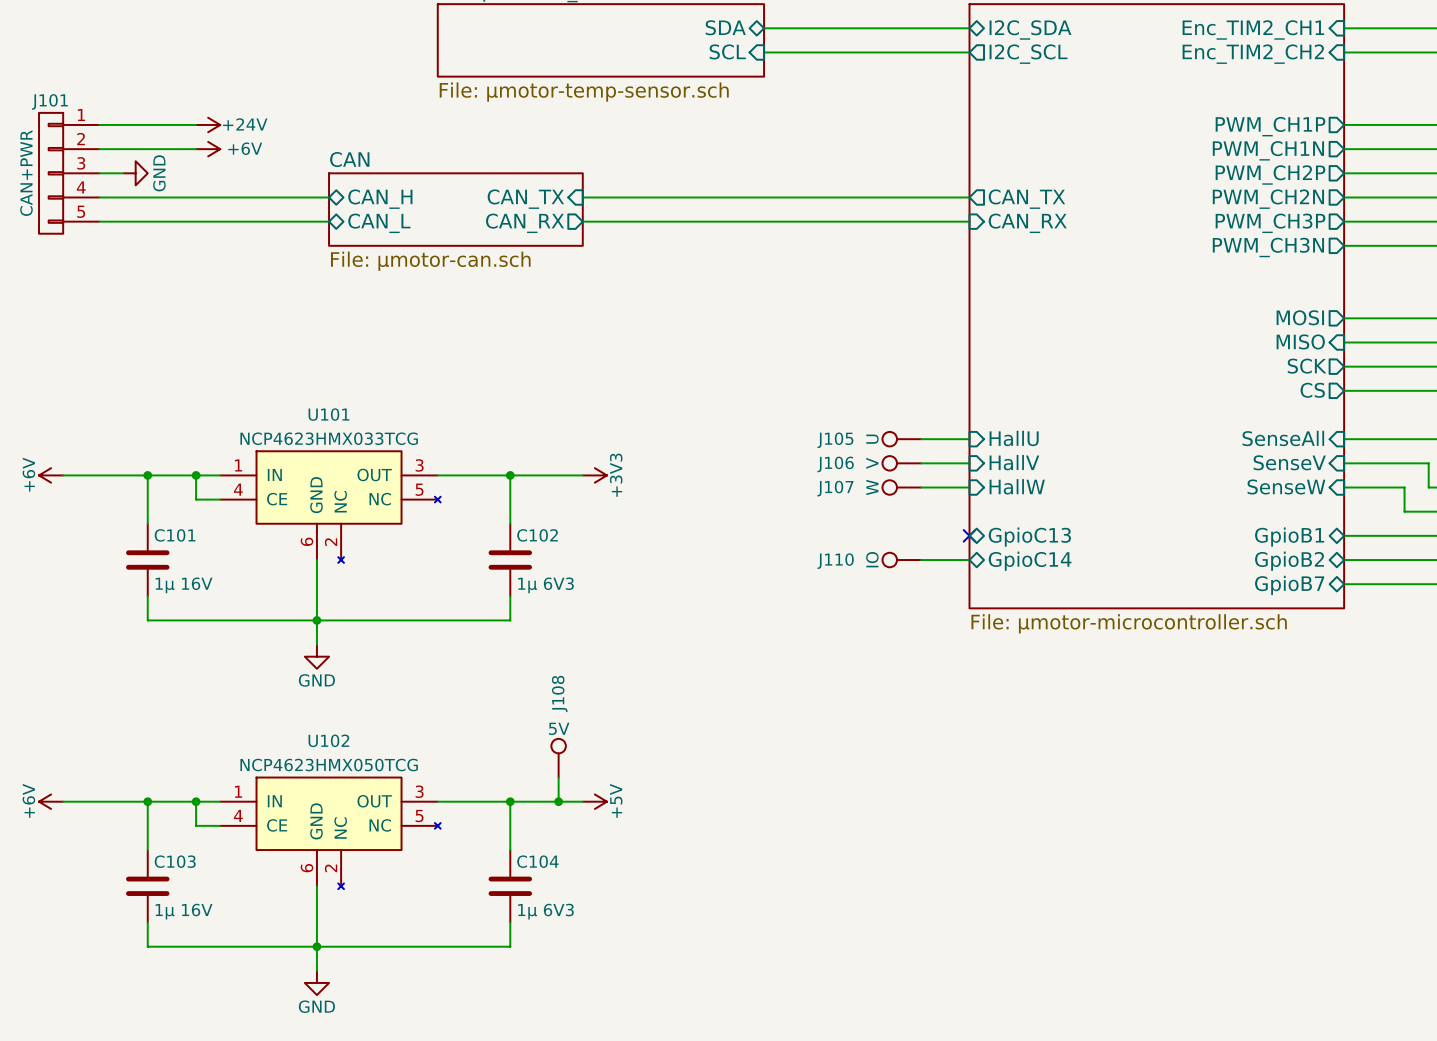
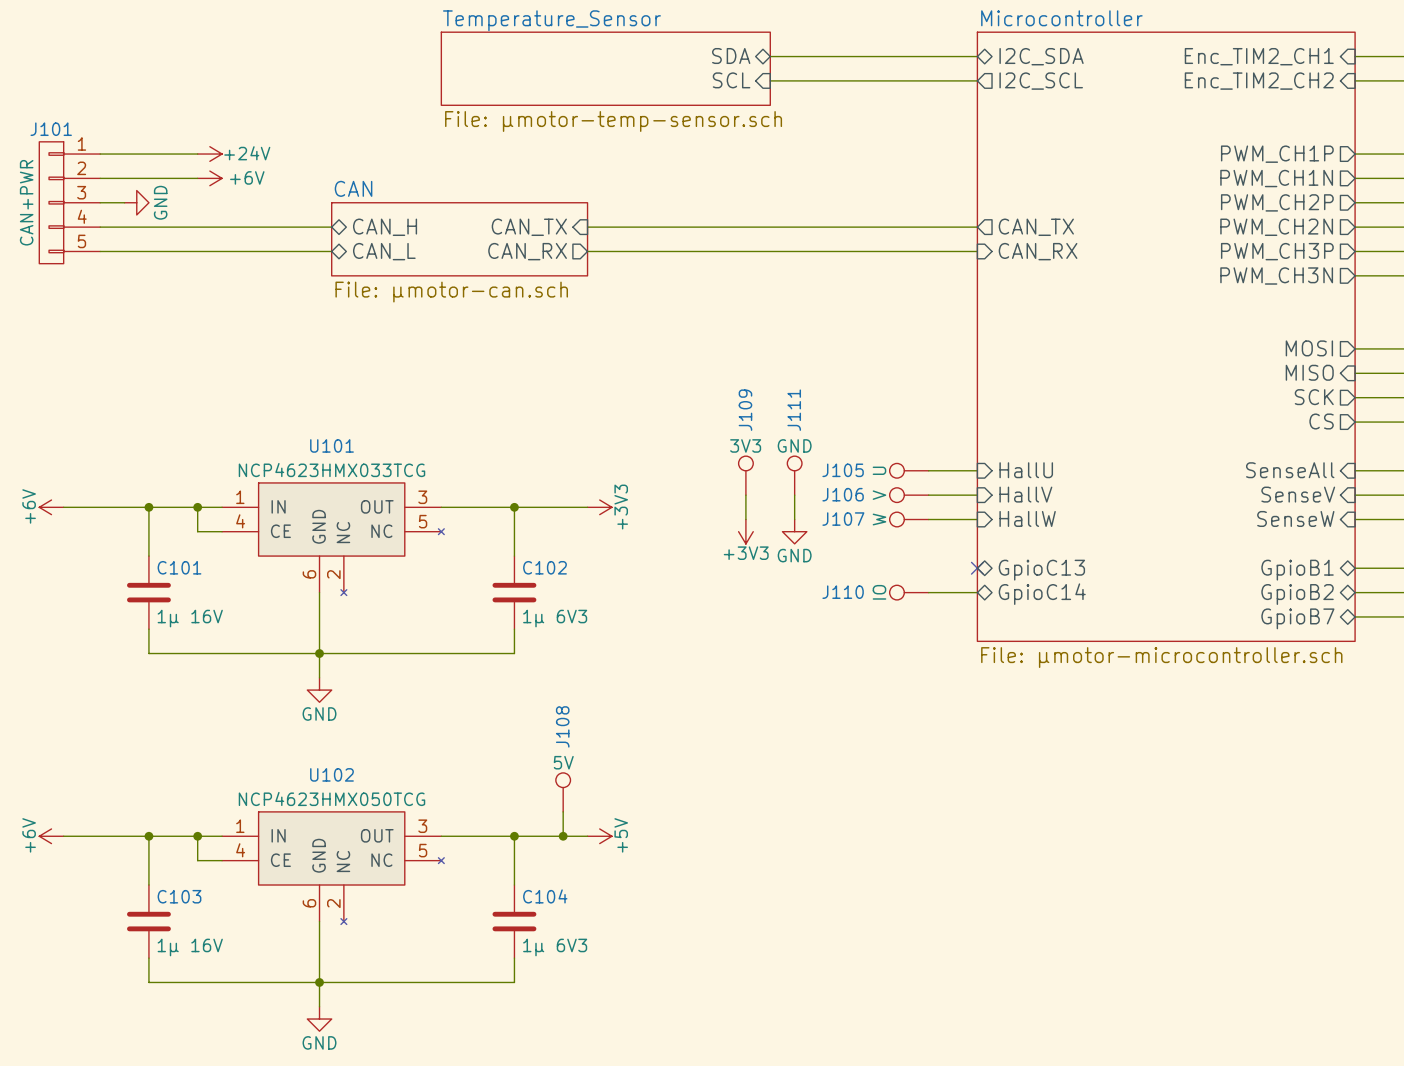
J109: none -> 3V3 (745, 475)
J111: none -> GND (794, 475)
wire: none -> (745, 495) (745, 519)
wire: none -> (794, 495) (794, 519)
power symbol: none -> +3V3 (745, 531)
power symbol: none -> GND (794, 531)

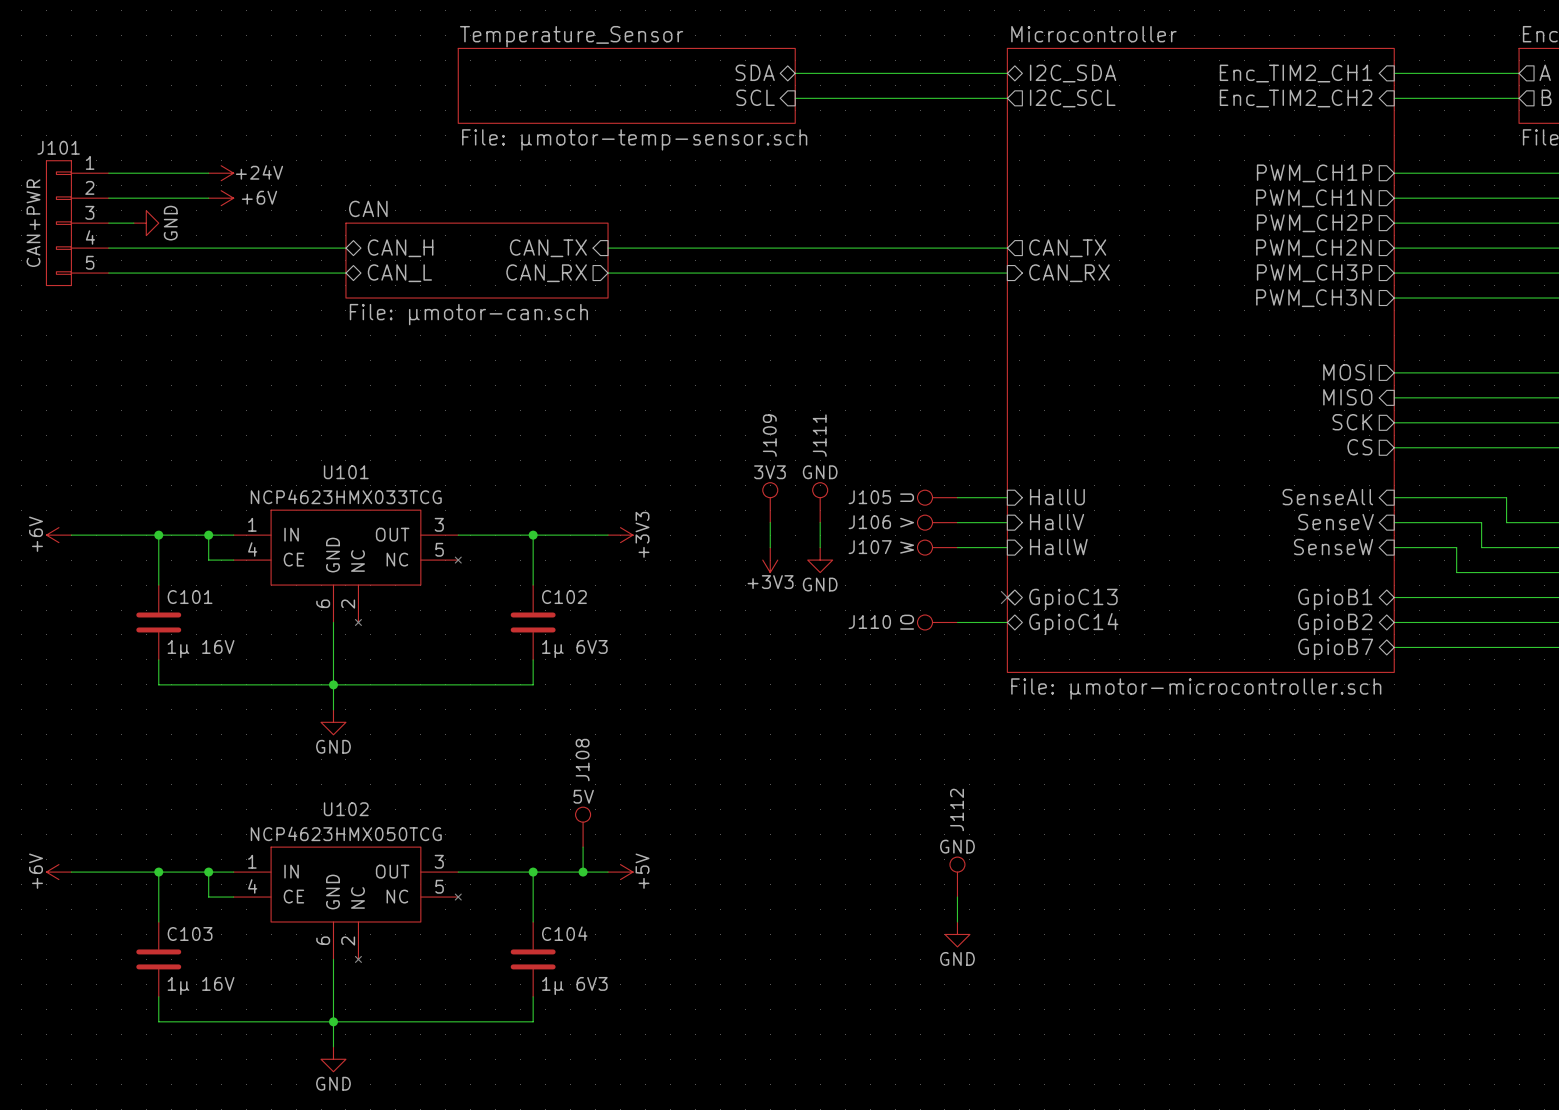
J112: none -> GND (957, 877)
wire: none -> (957, 897) (957, 921)
power symbol: none -> GND (957, 934)

